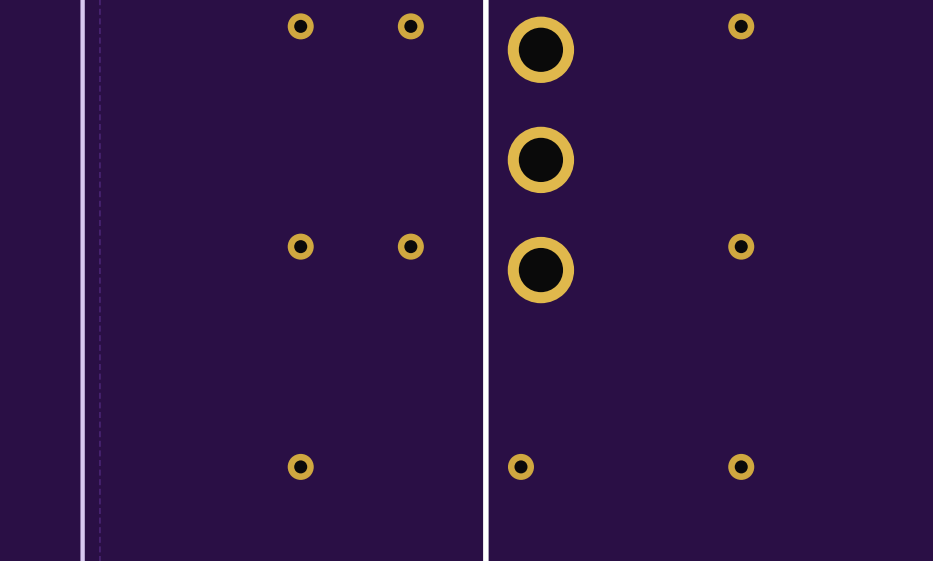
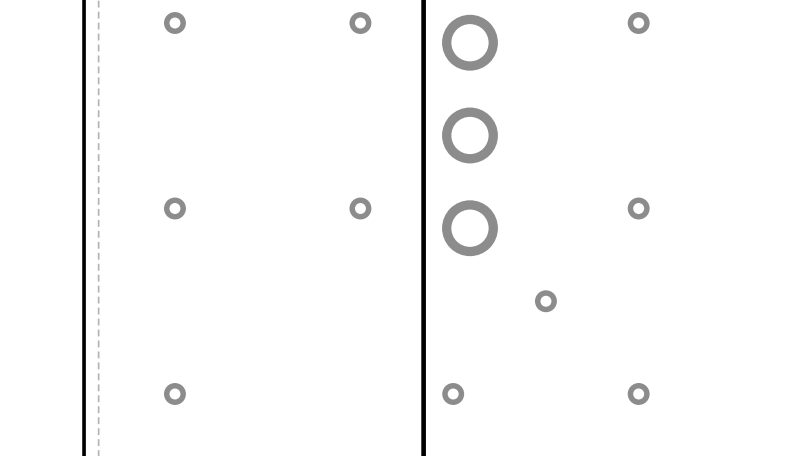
via position: (300, 26) -> (174, 23)
via position: (300, 246) -> (174, 208)
via: none -> (545, 301)
via position: (300, 466) -> (174, 393)

